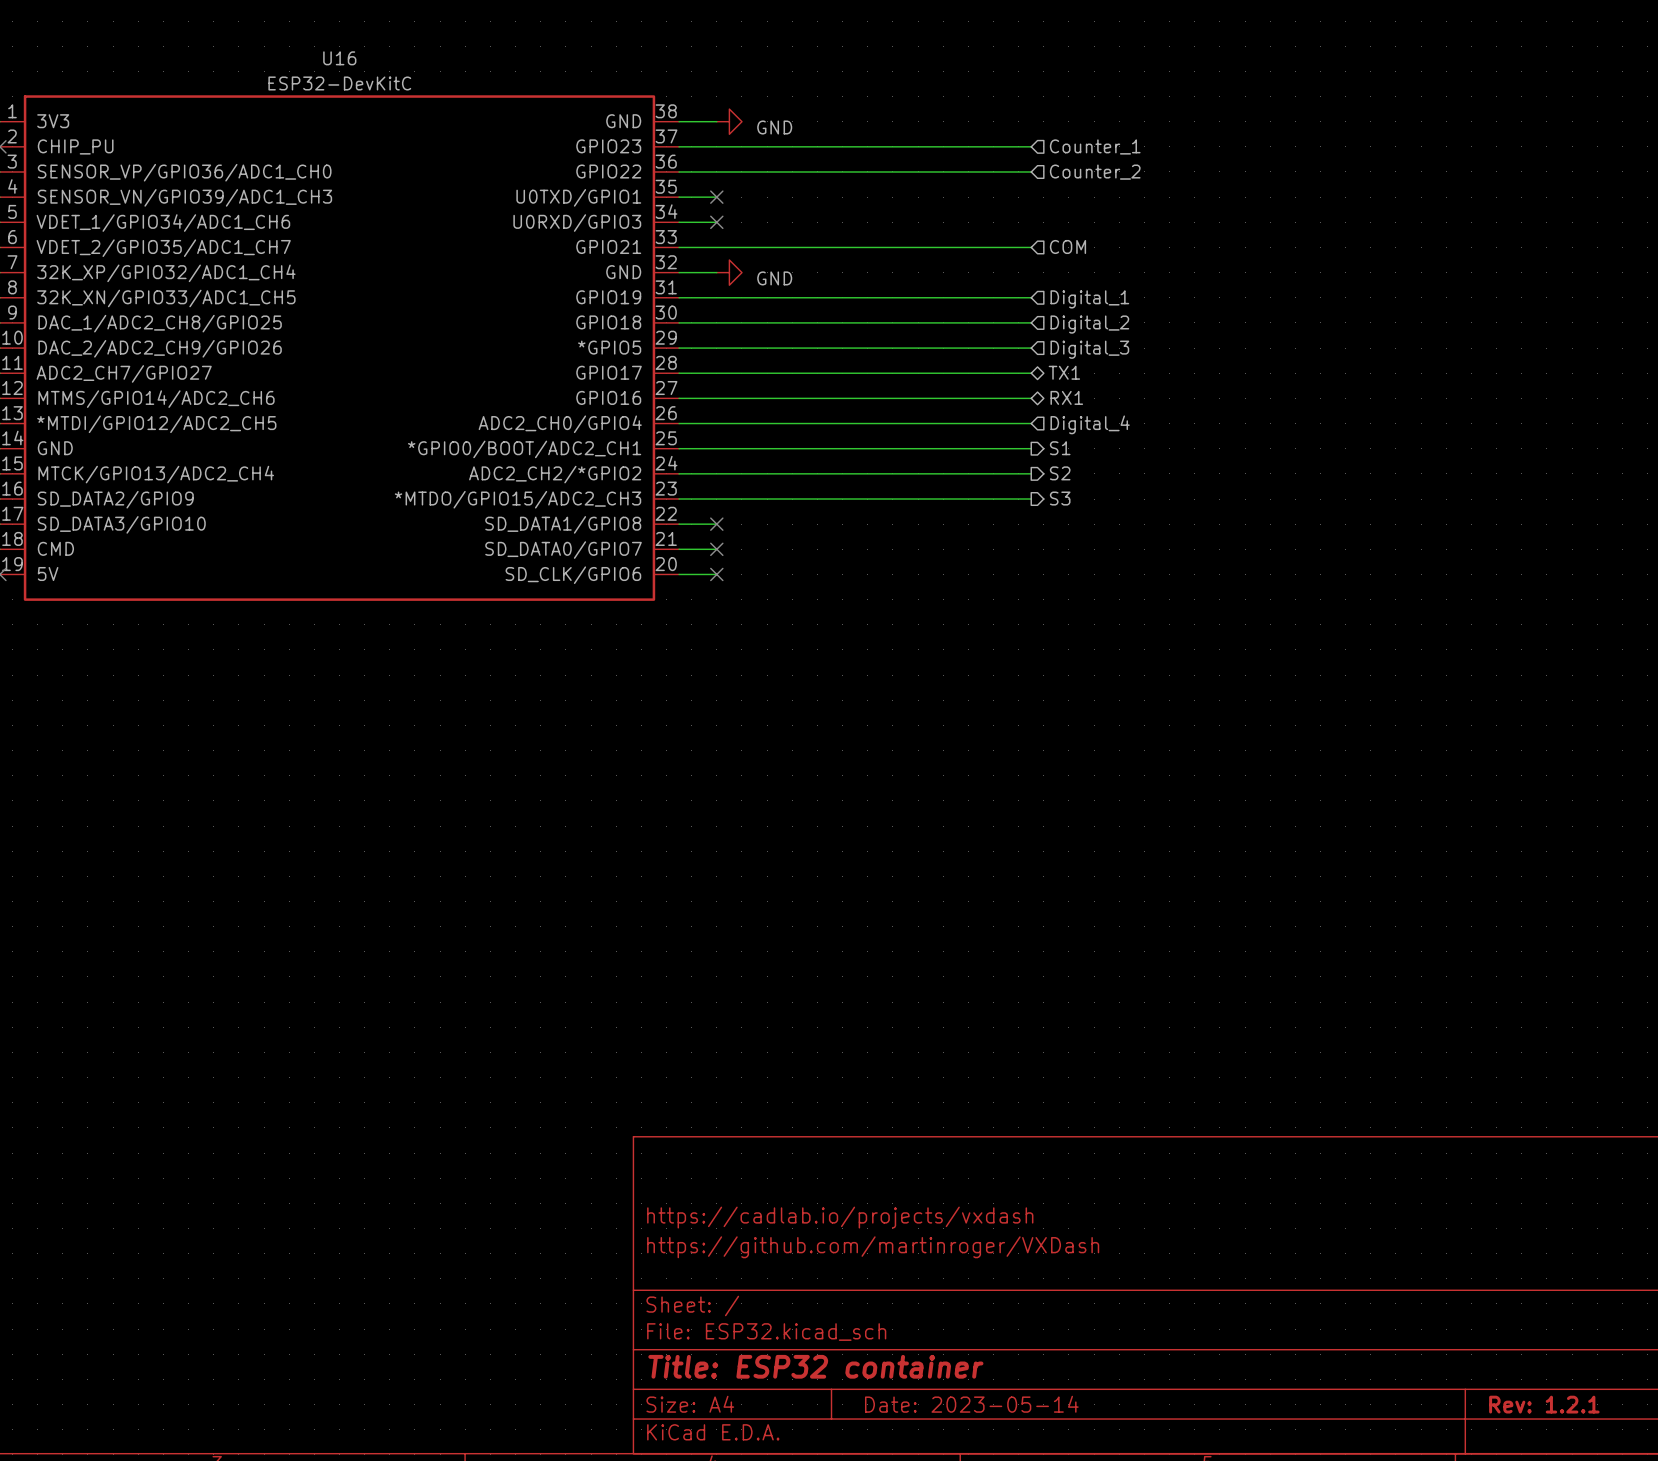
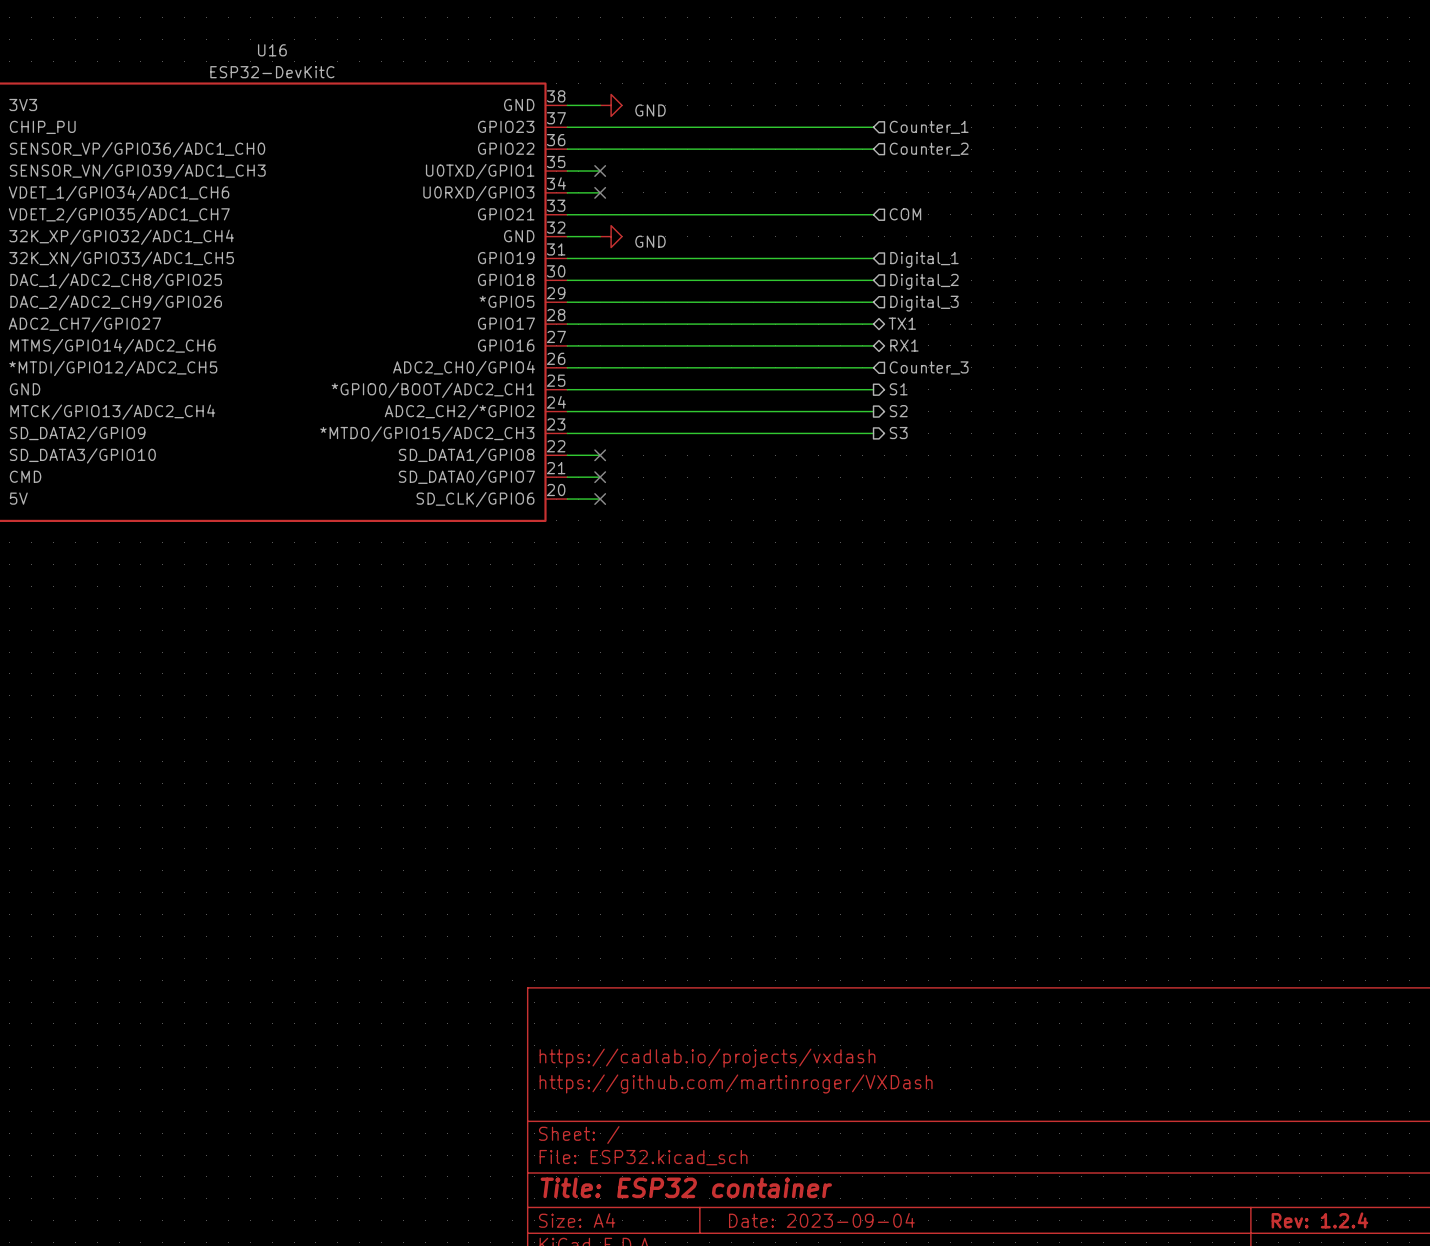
hierarchical label: Digital_4 (1090, 424) -> Counter_3 (929, 367)
title block: Date: 2023-05-14 (971, 1404) -> Date: 2023-09-04 (821, 1220)
title block: Rev: 1.2.1 (1544, 1404) -> Rev: 1.2.4 (1319, 1220)

